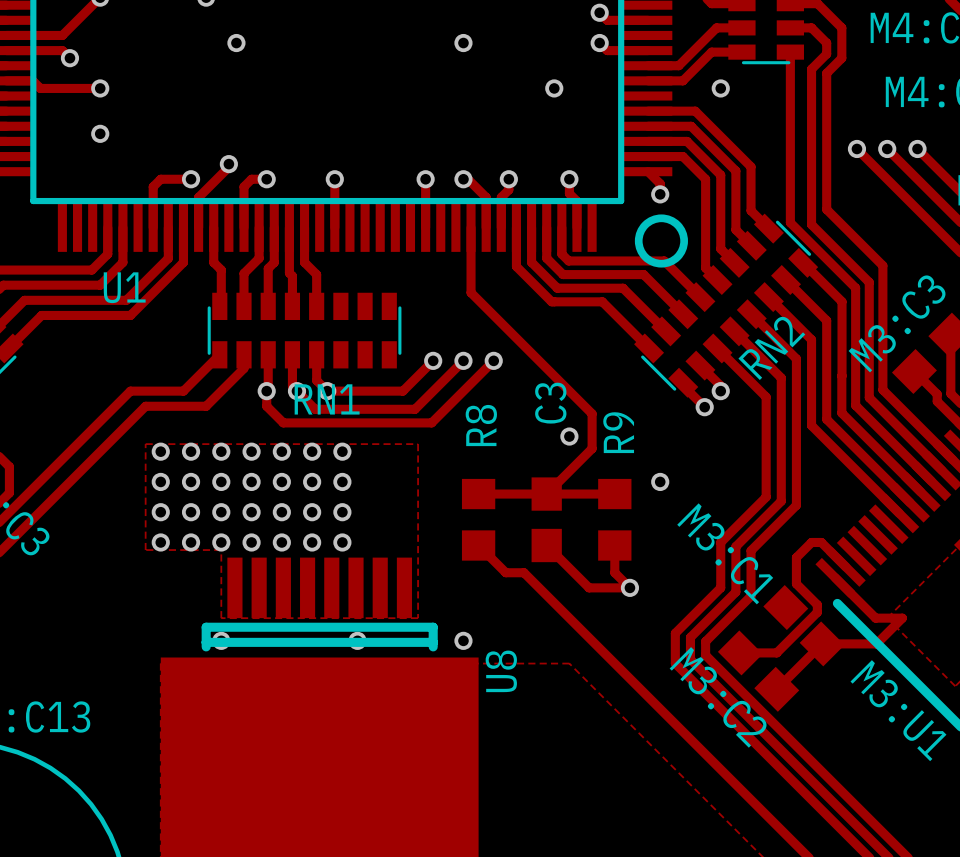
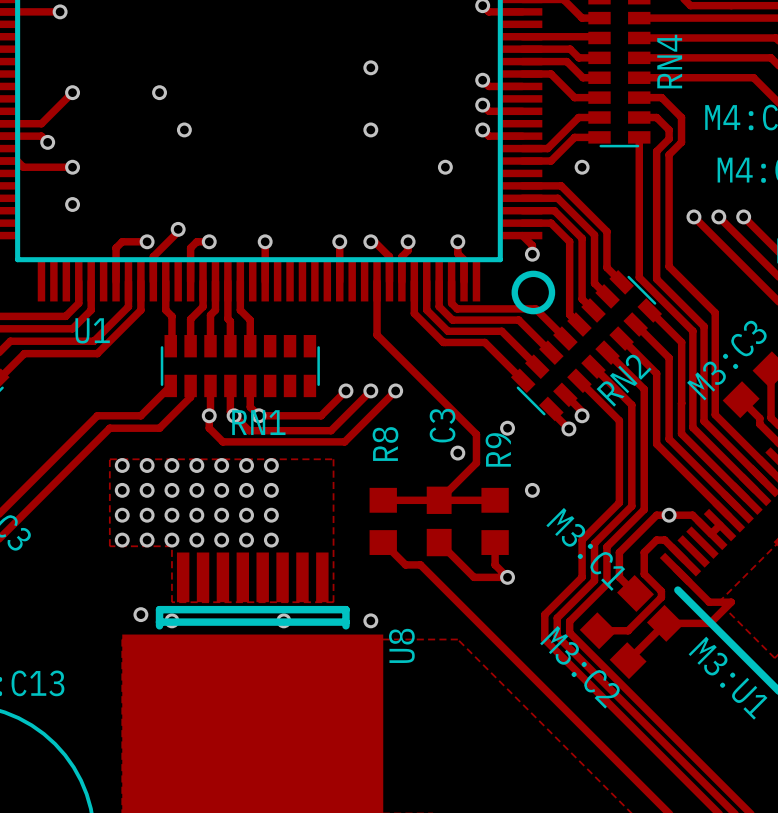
via: none -> (507, 428)
via: none -> (669, 515)
track: none -> (720, 525) (711, 533) (692, 515) (656, 515) (619, 552) (619, 577) (635, 593)
via: none -> (140, 614)

